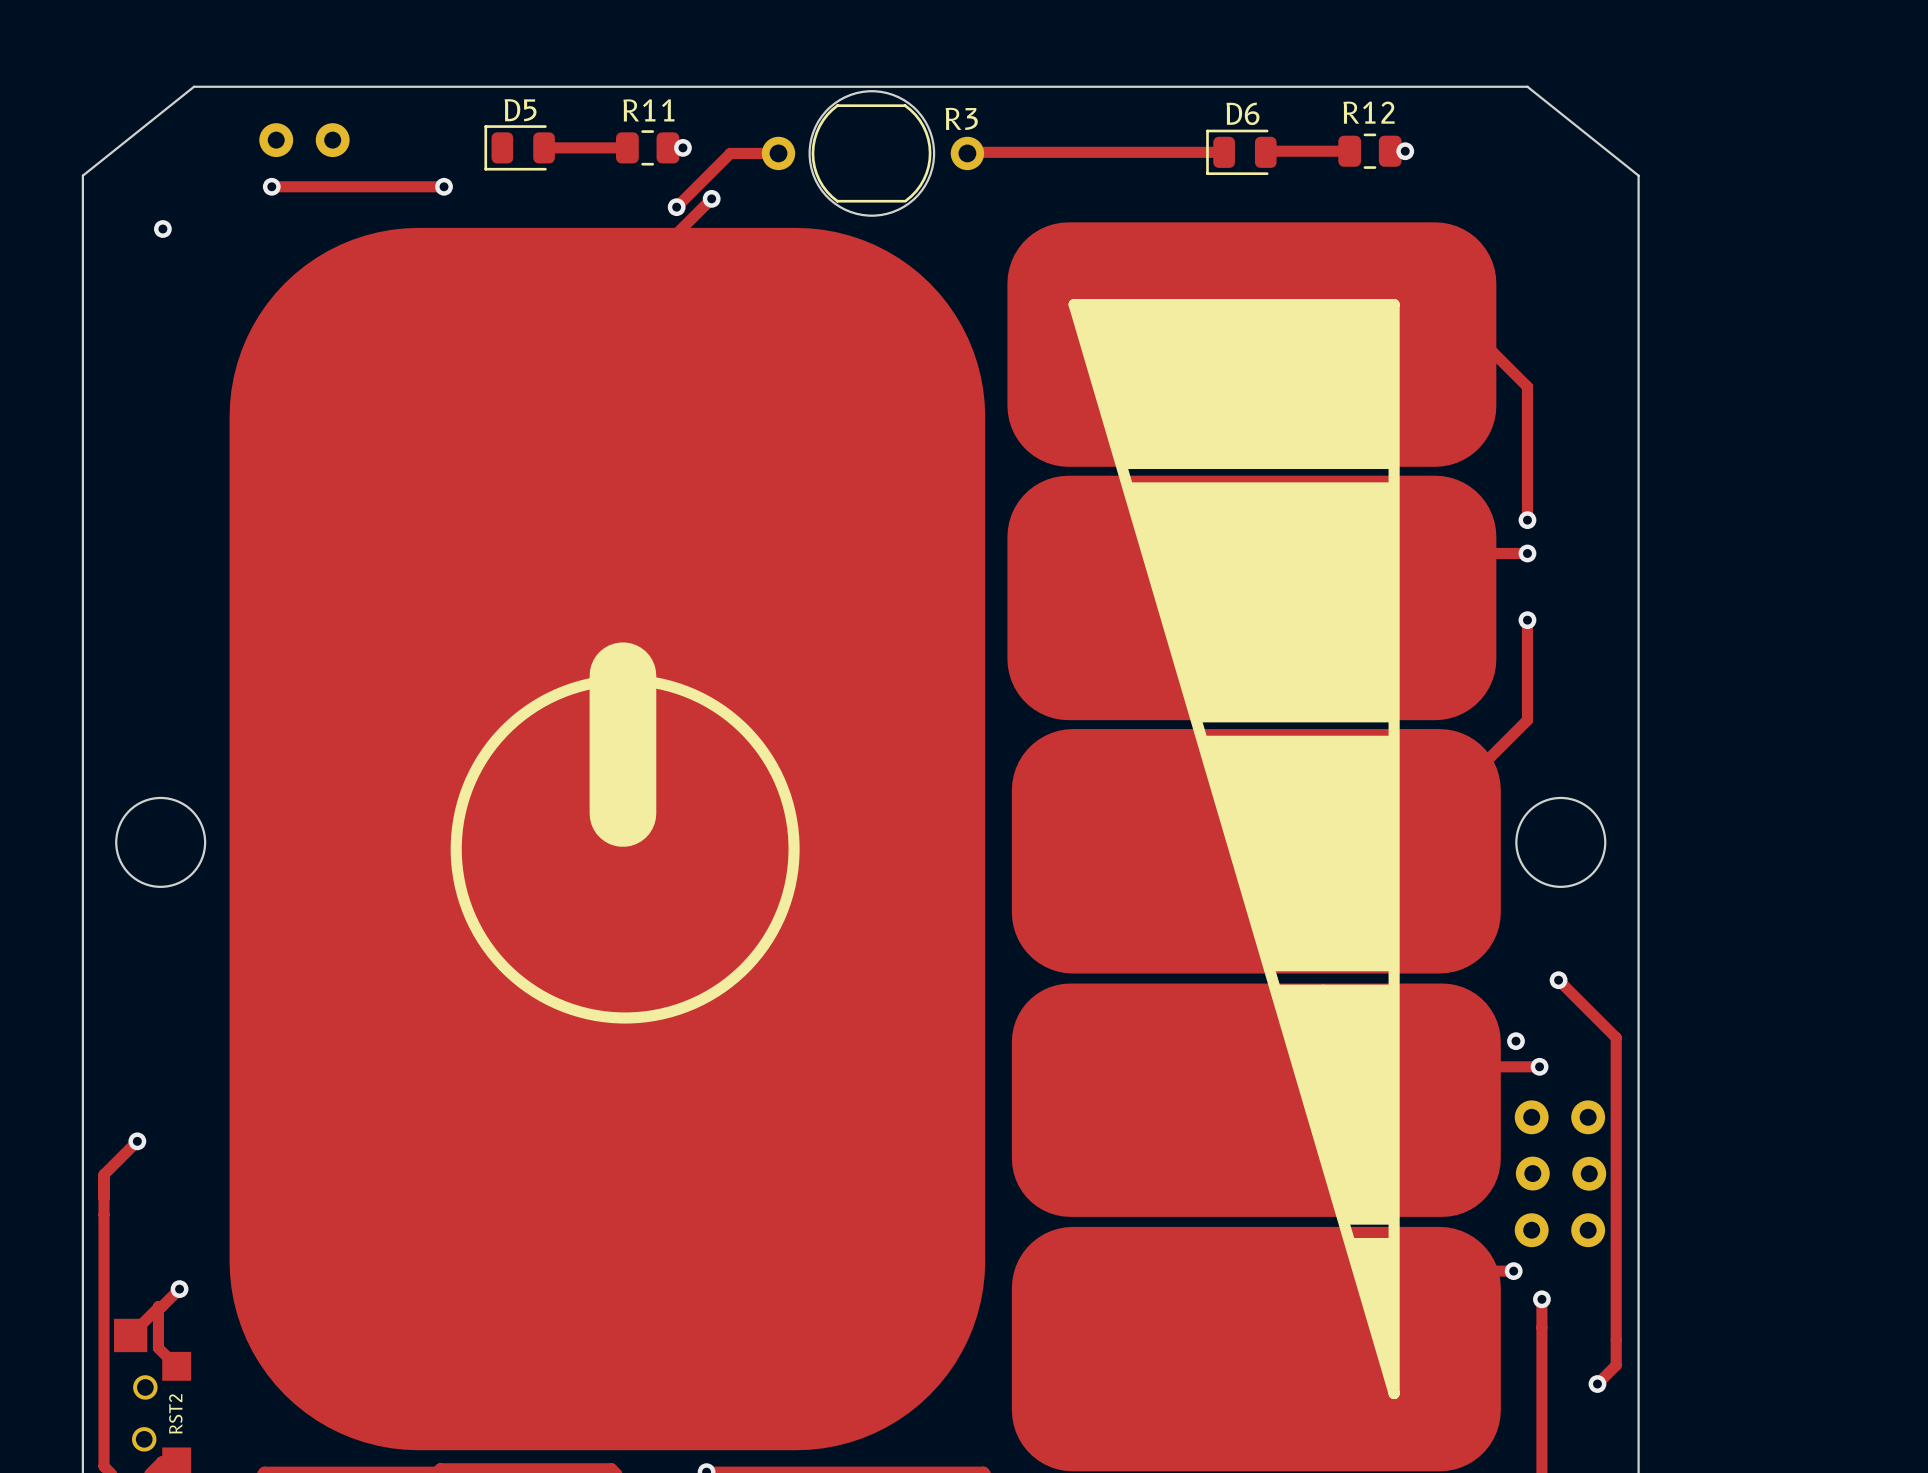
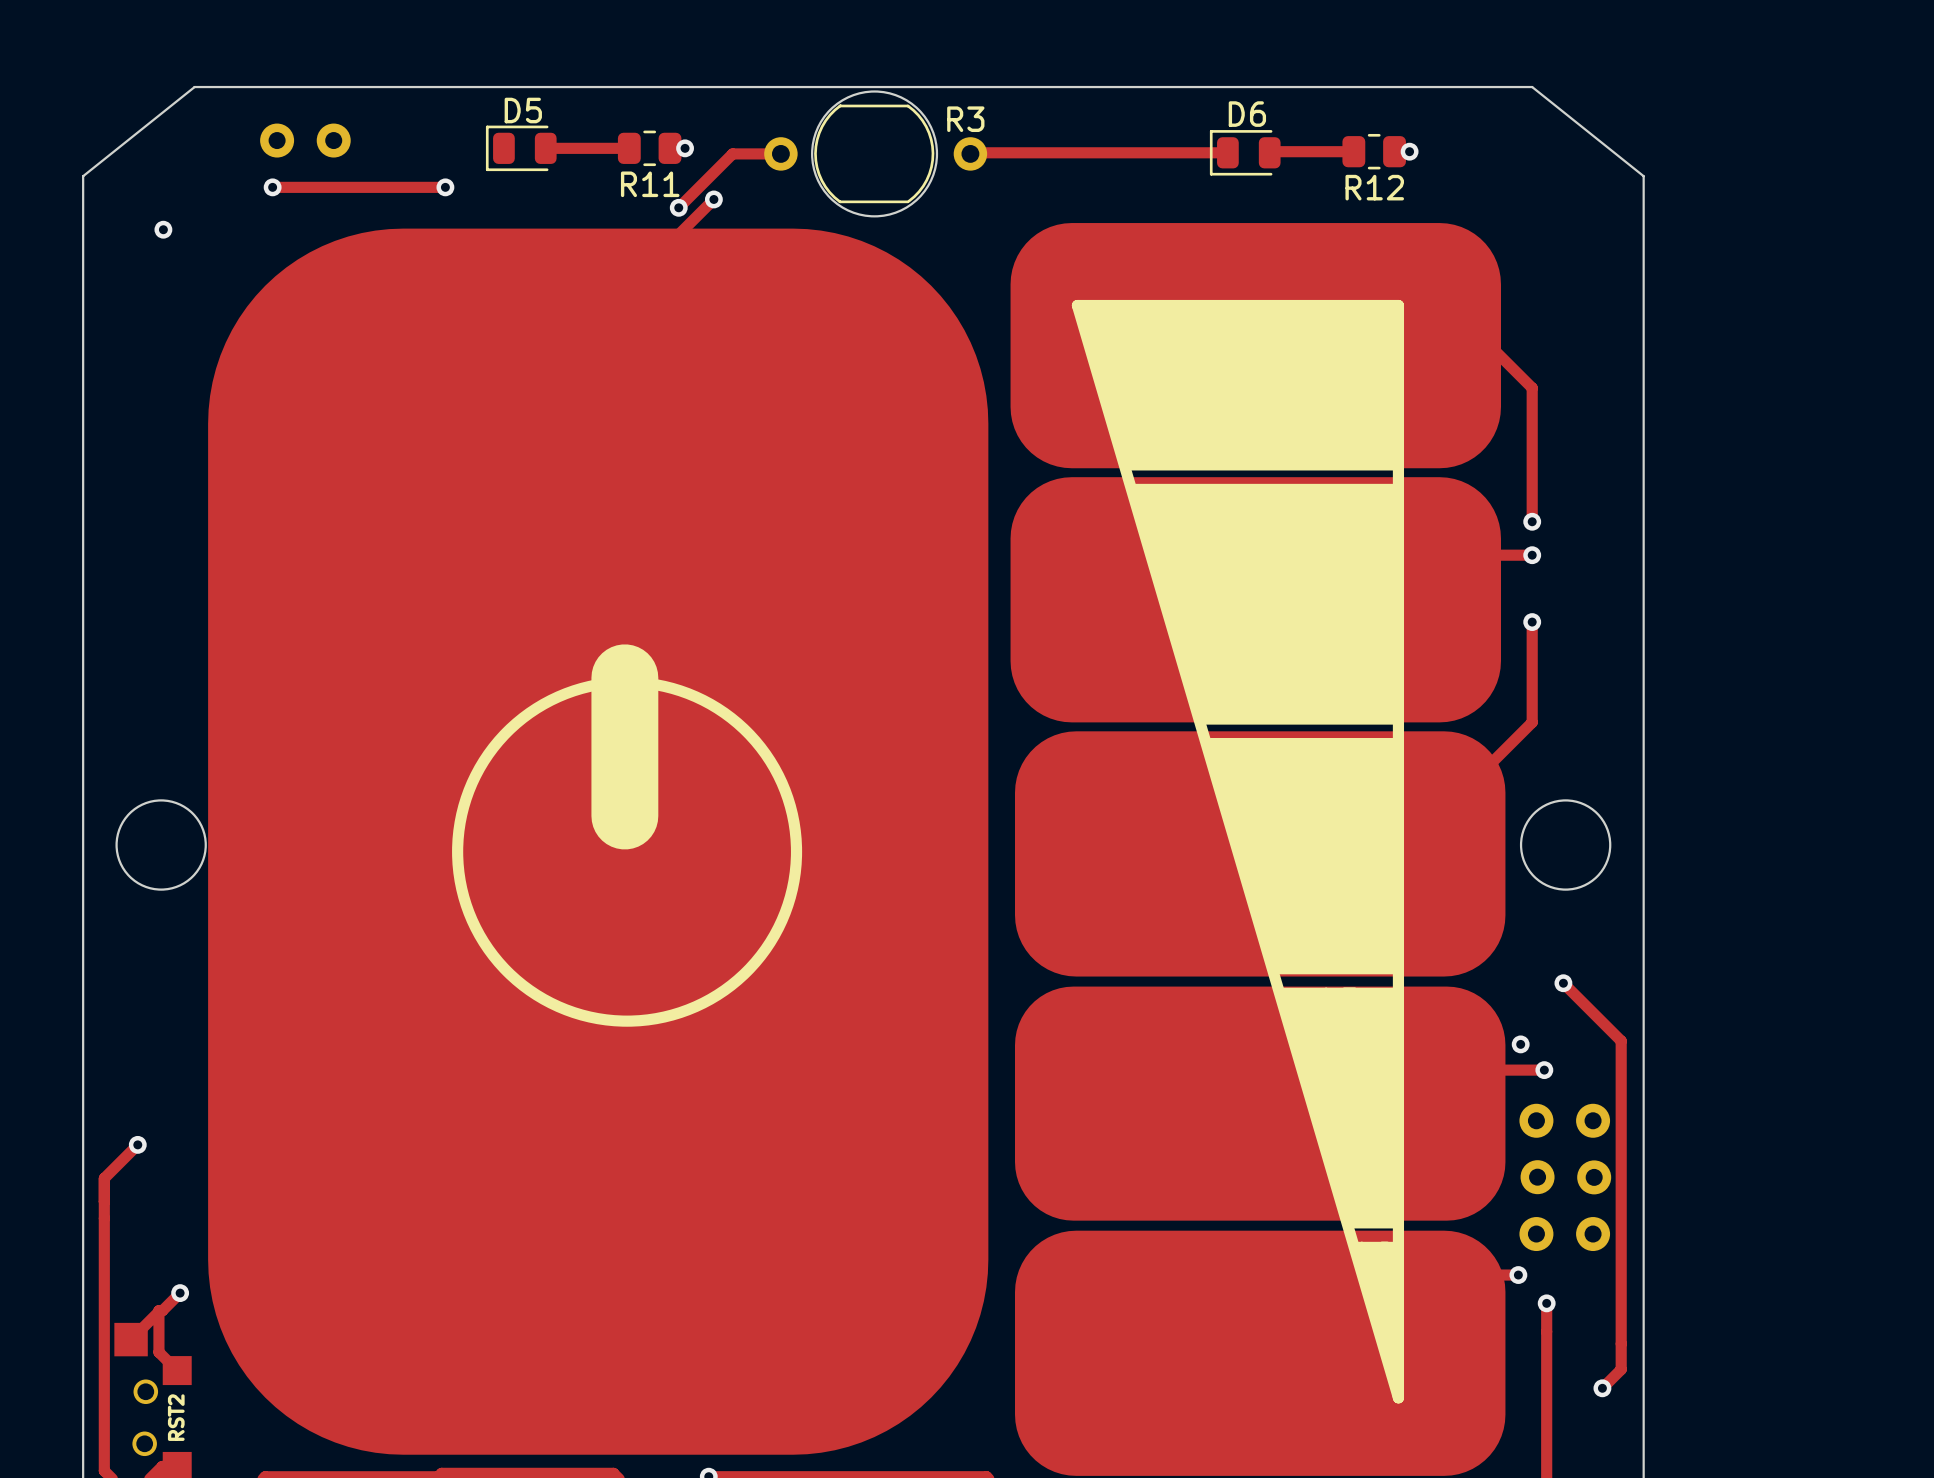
R11 name position: R11 (648, 110) -> R11 (650, 184)
R12 name position: R12 (1369, 112) -> R12 (1374, 187)
part footprint: [229, 227, 986, 1451] -> [208, 228, 989, 1455]

